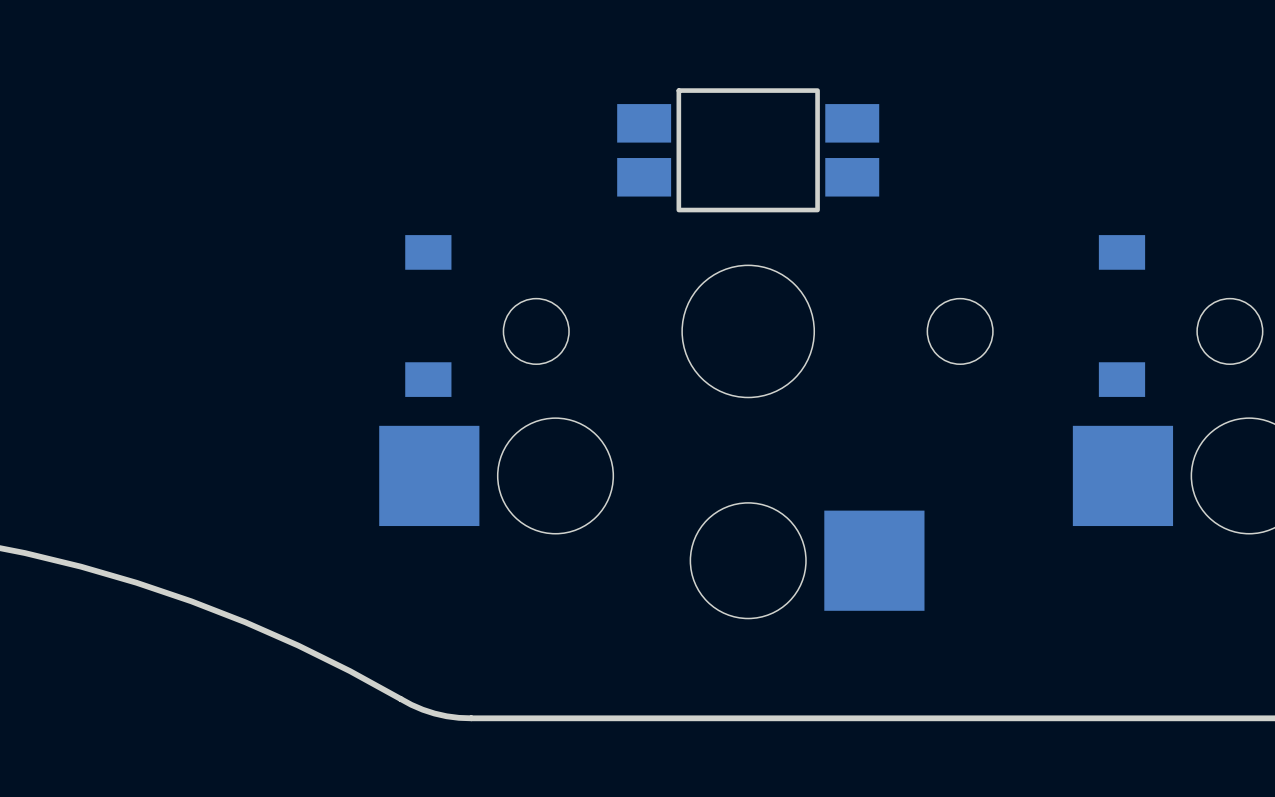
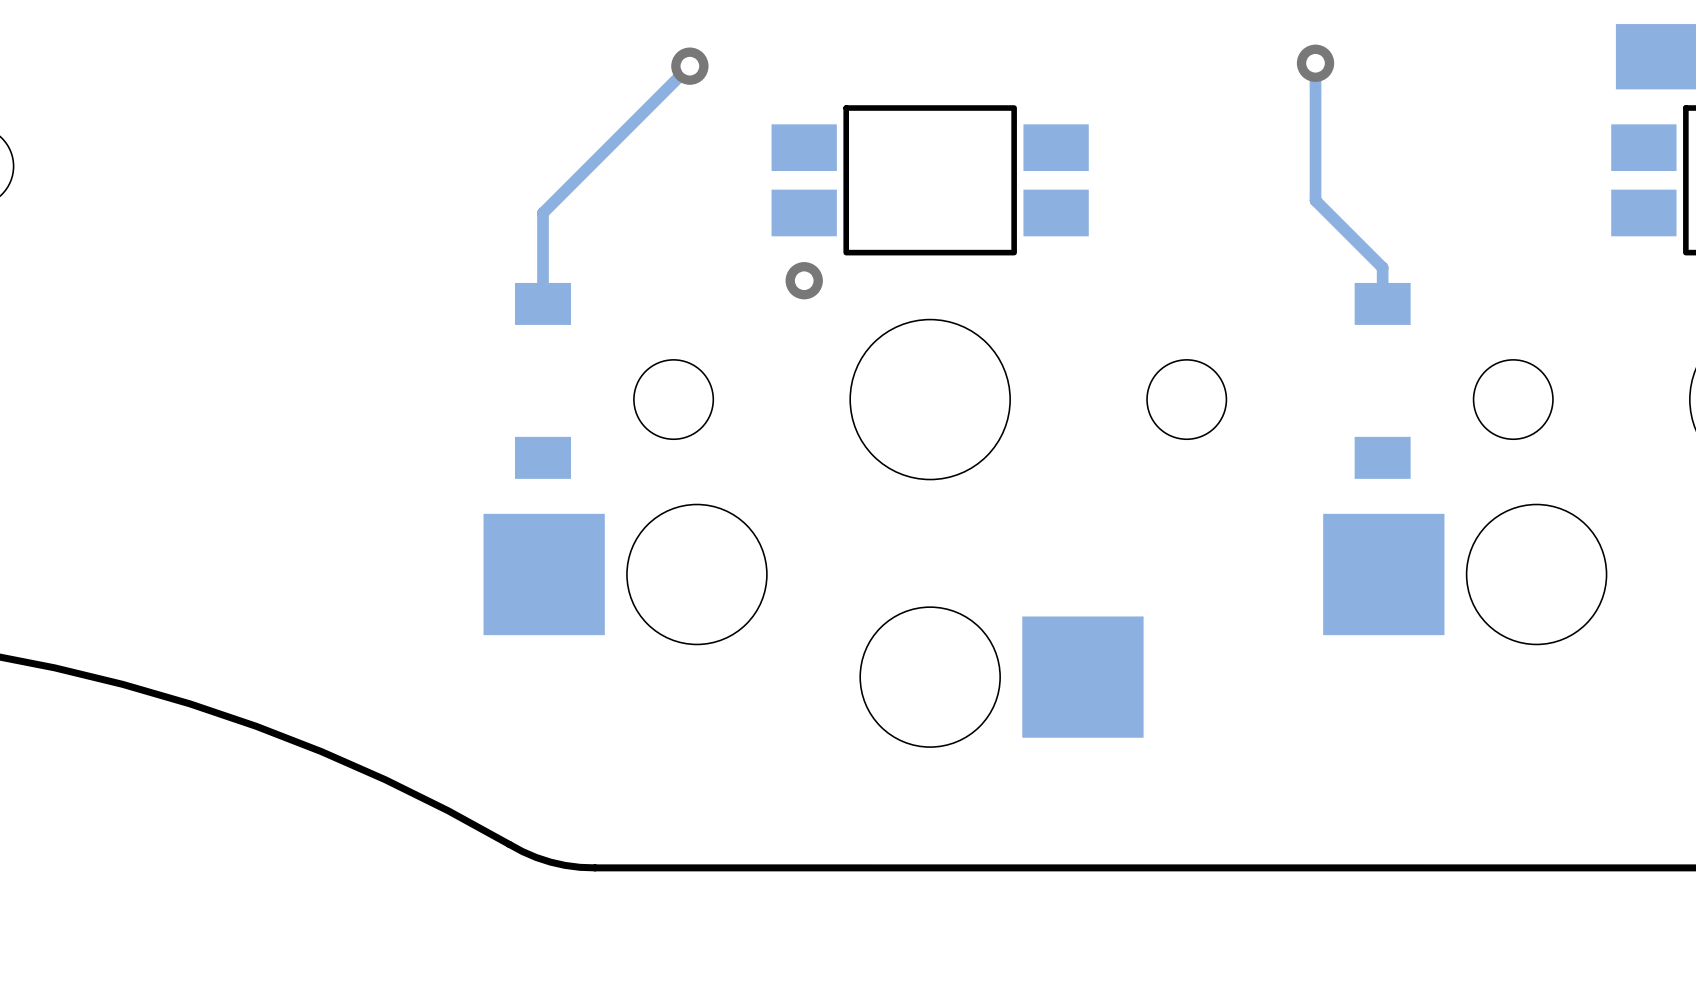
bottom track: none -> (1315, 63) (1315, 200) (1382, 267) (1382, 303)
via: none -> (1315, 63)
bottom track: none -> (689, 66) (542, 213) (542, 303)
via: none -> (689, 66)
via: none -> (804, 280)

